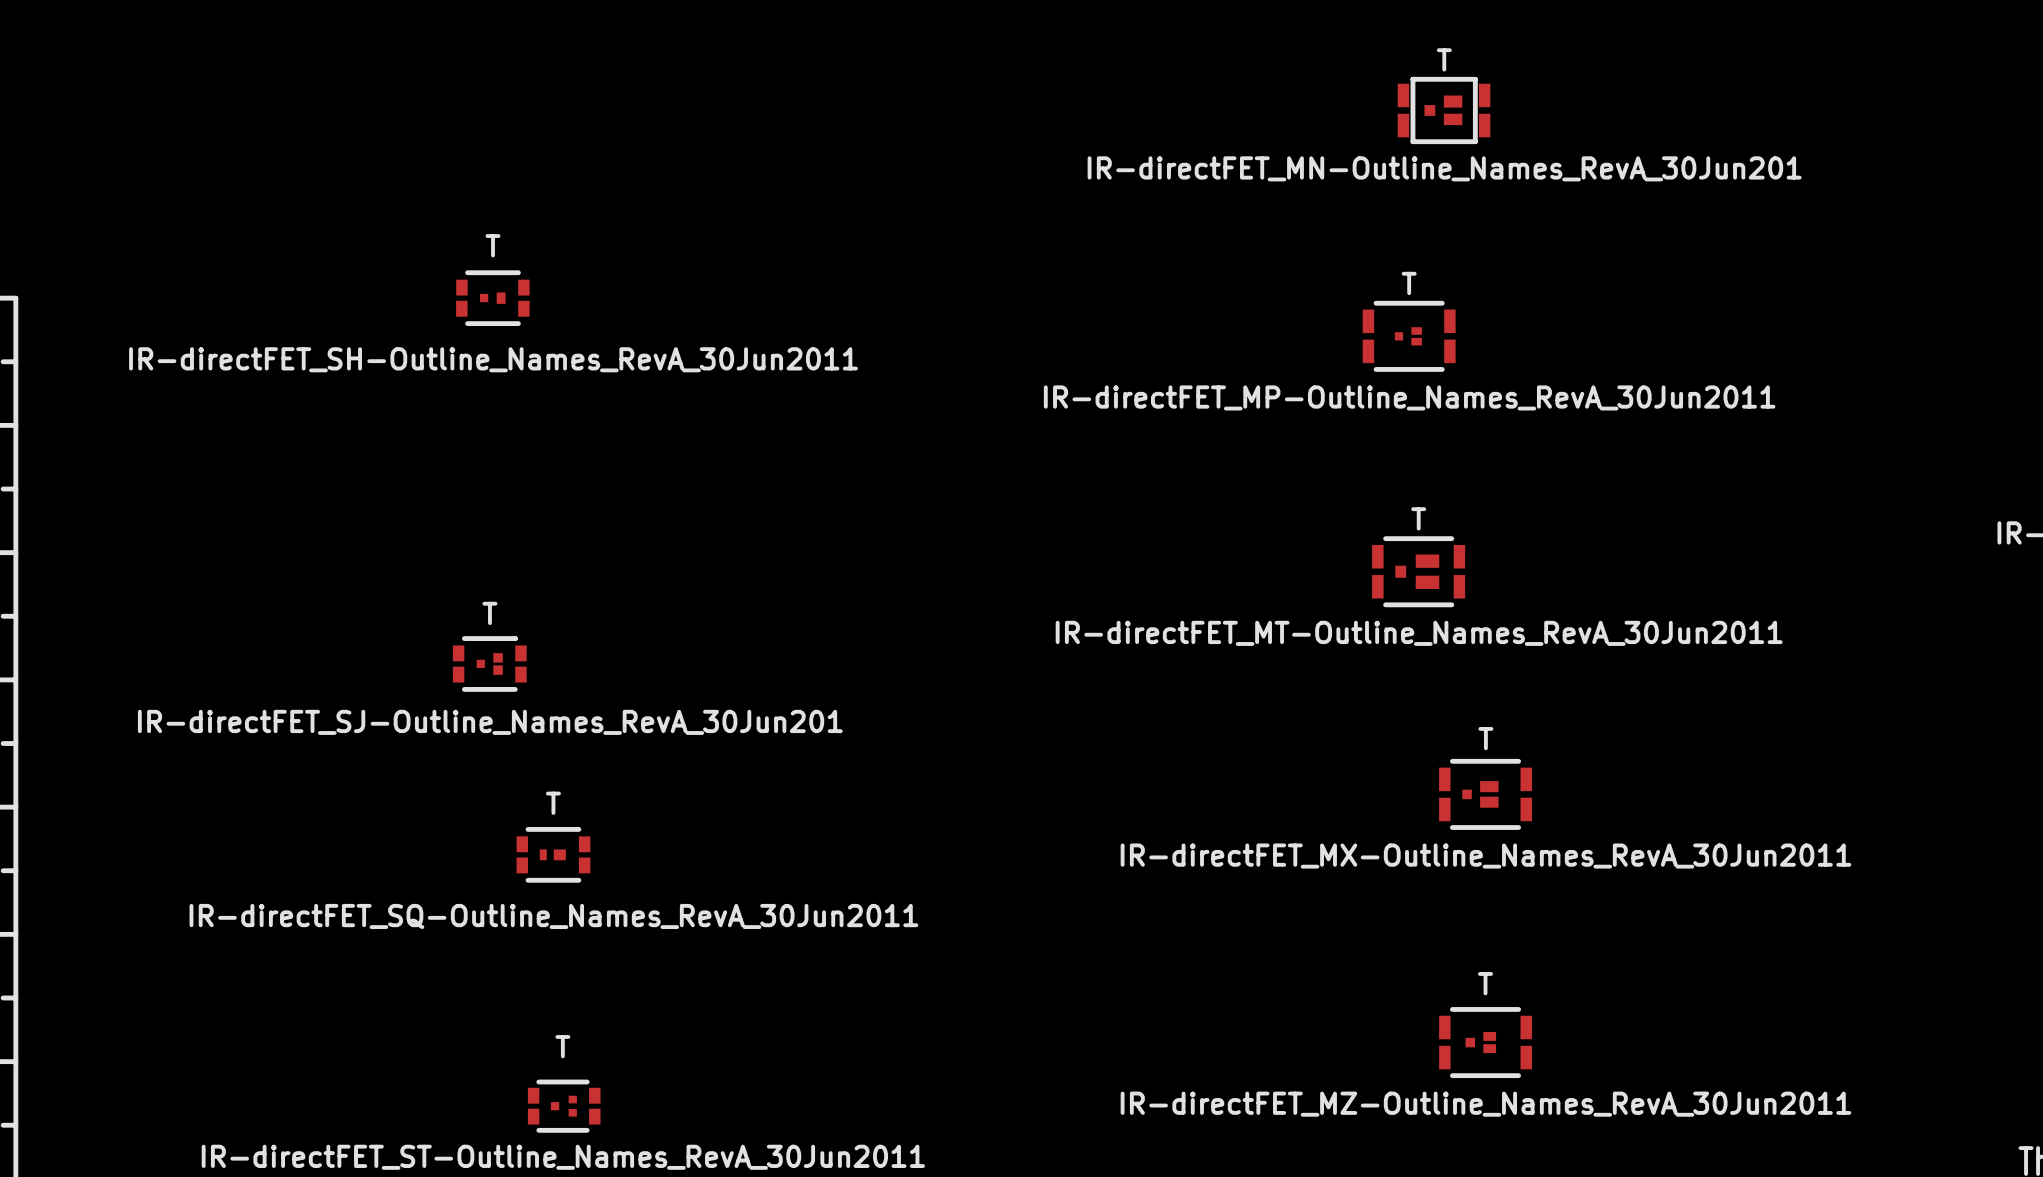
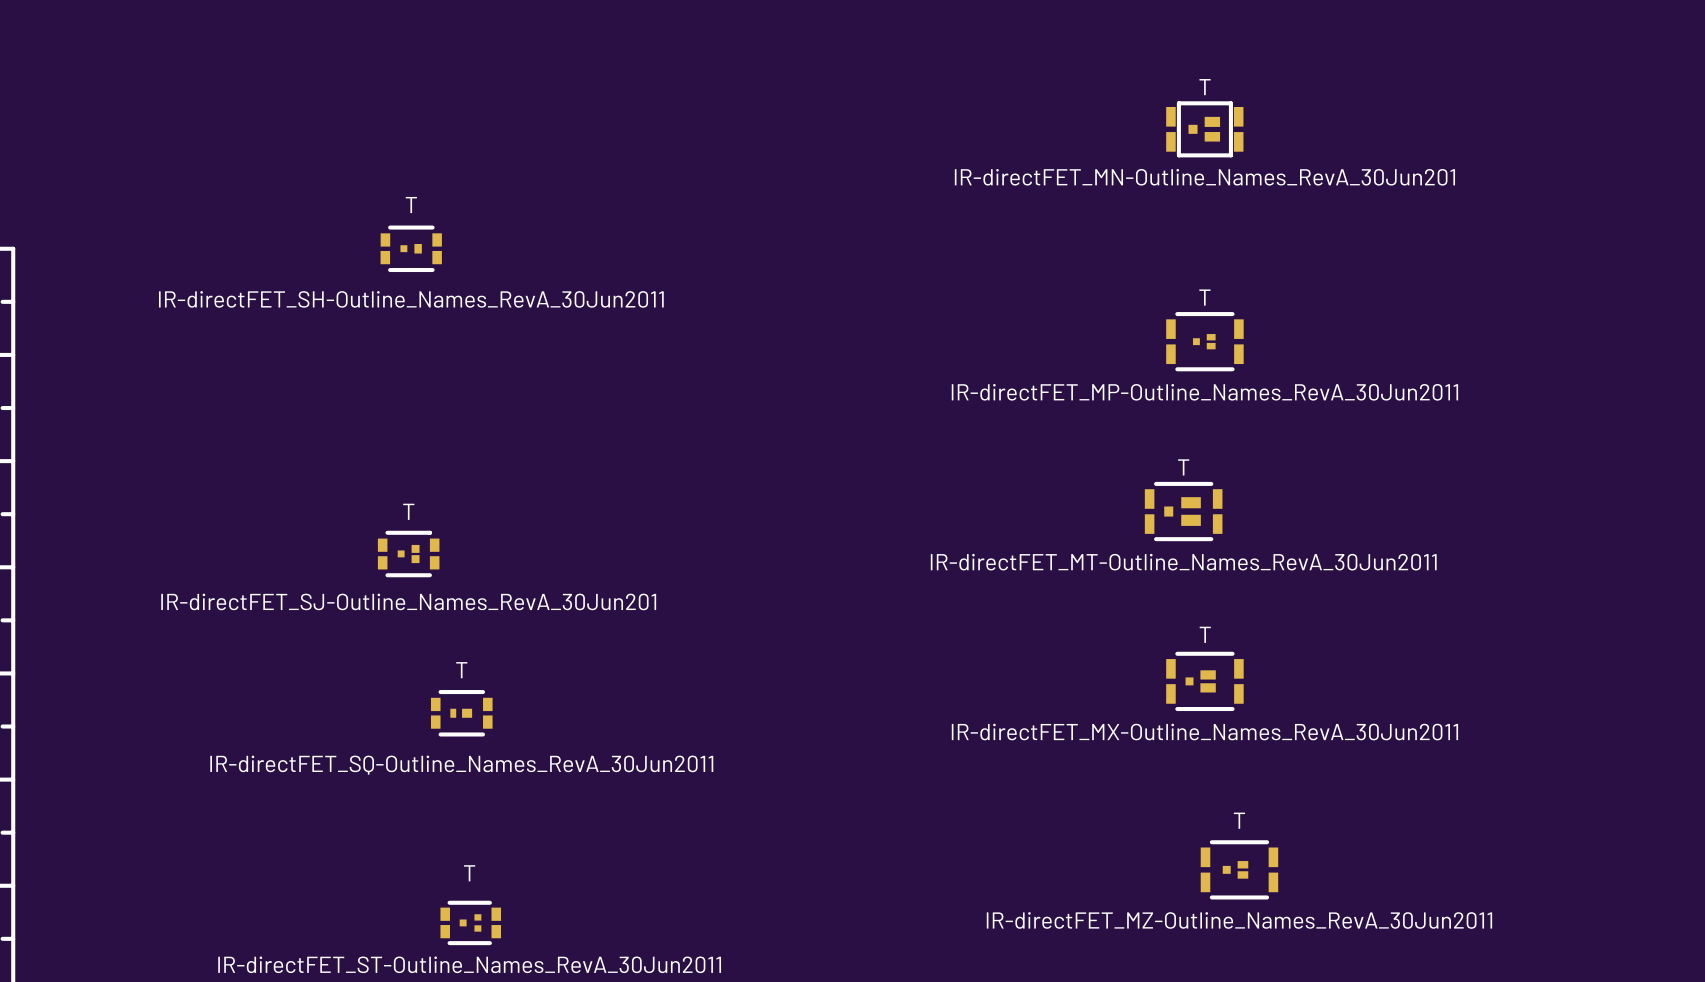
T position: (1444, 110) -> (1204, 129)
T position: (1409, 336) -> (1204, 341)
T position: (1418, 571) -> (1183, 511)
T position: (1485, 794) -> (1204, 681)

